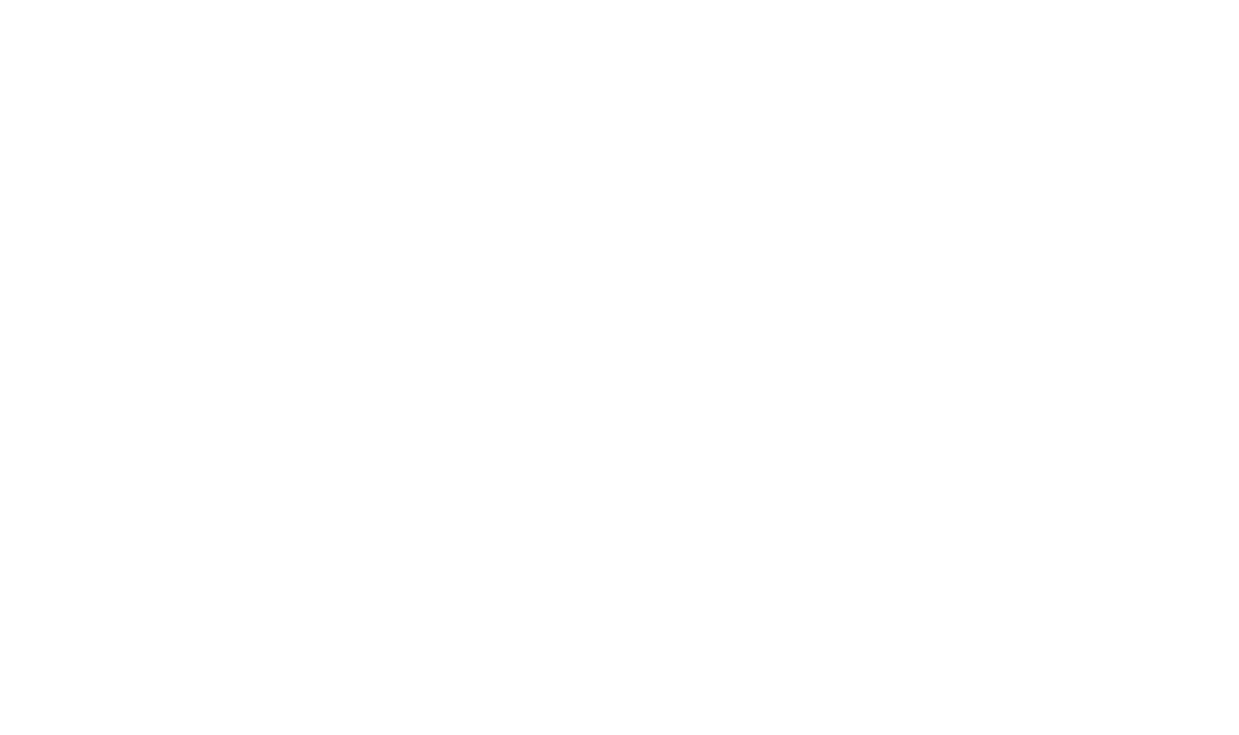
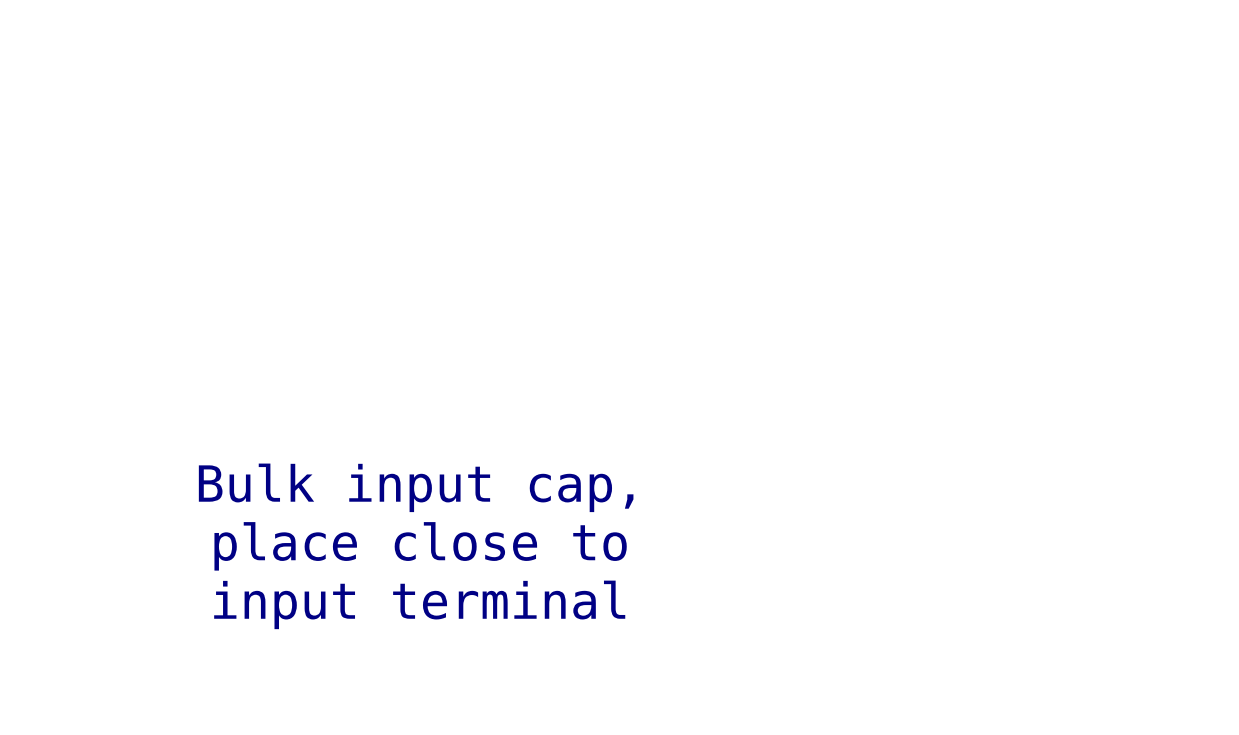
text: none -> Bulk input cap, (416, 487)
text: none -> place close to (420, 546)
text: none -> input terminal (419, 604)

